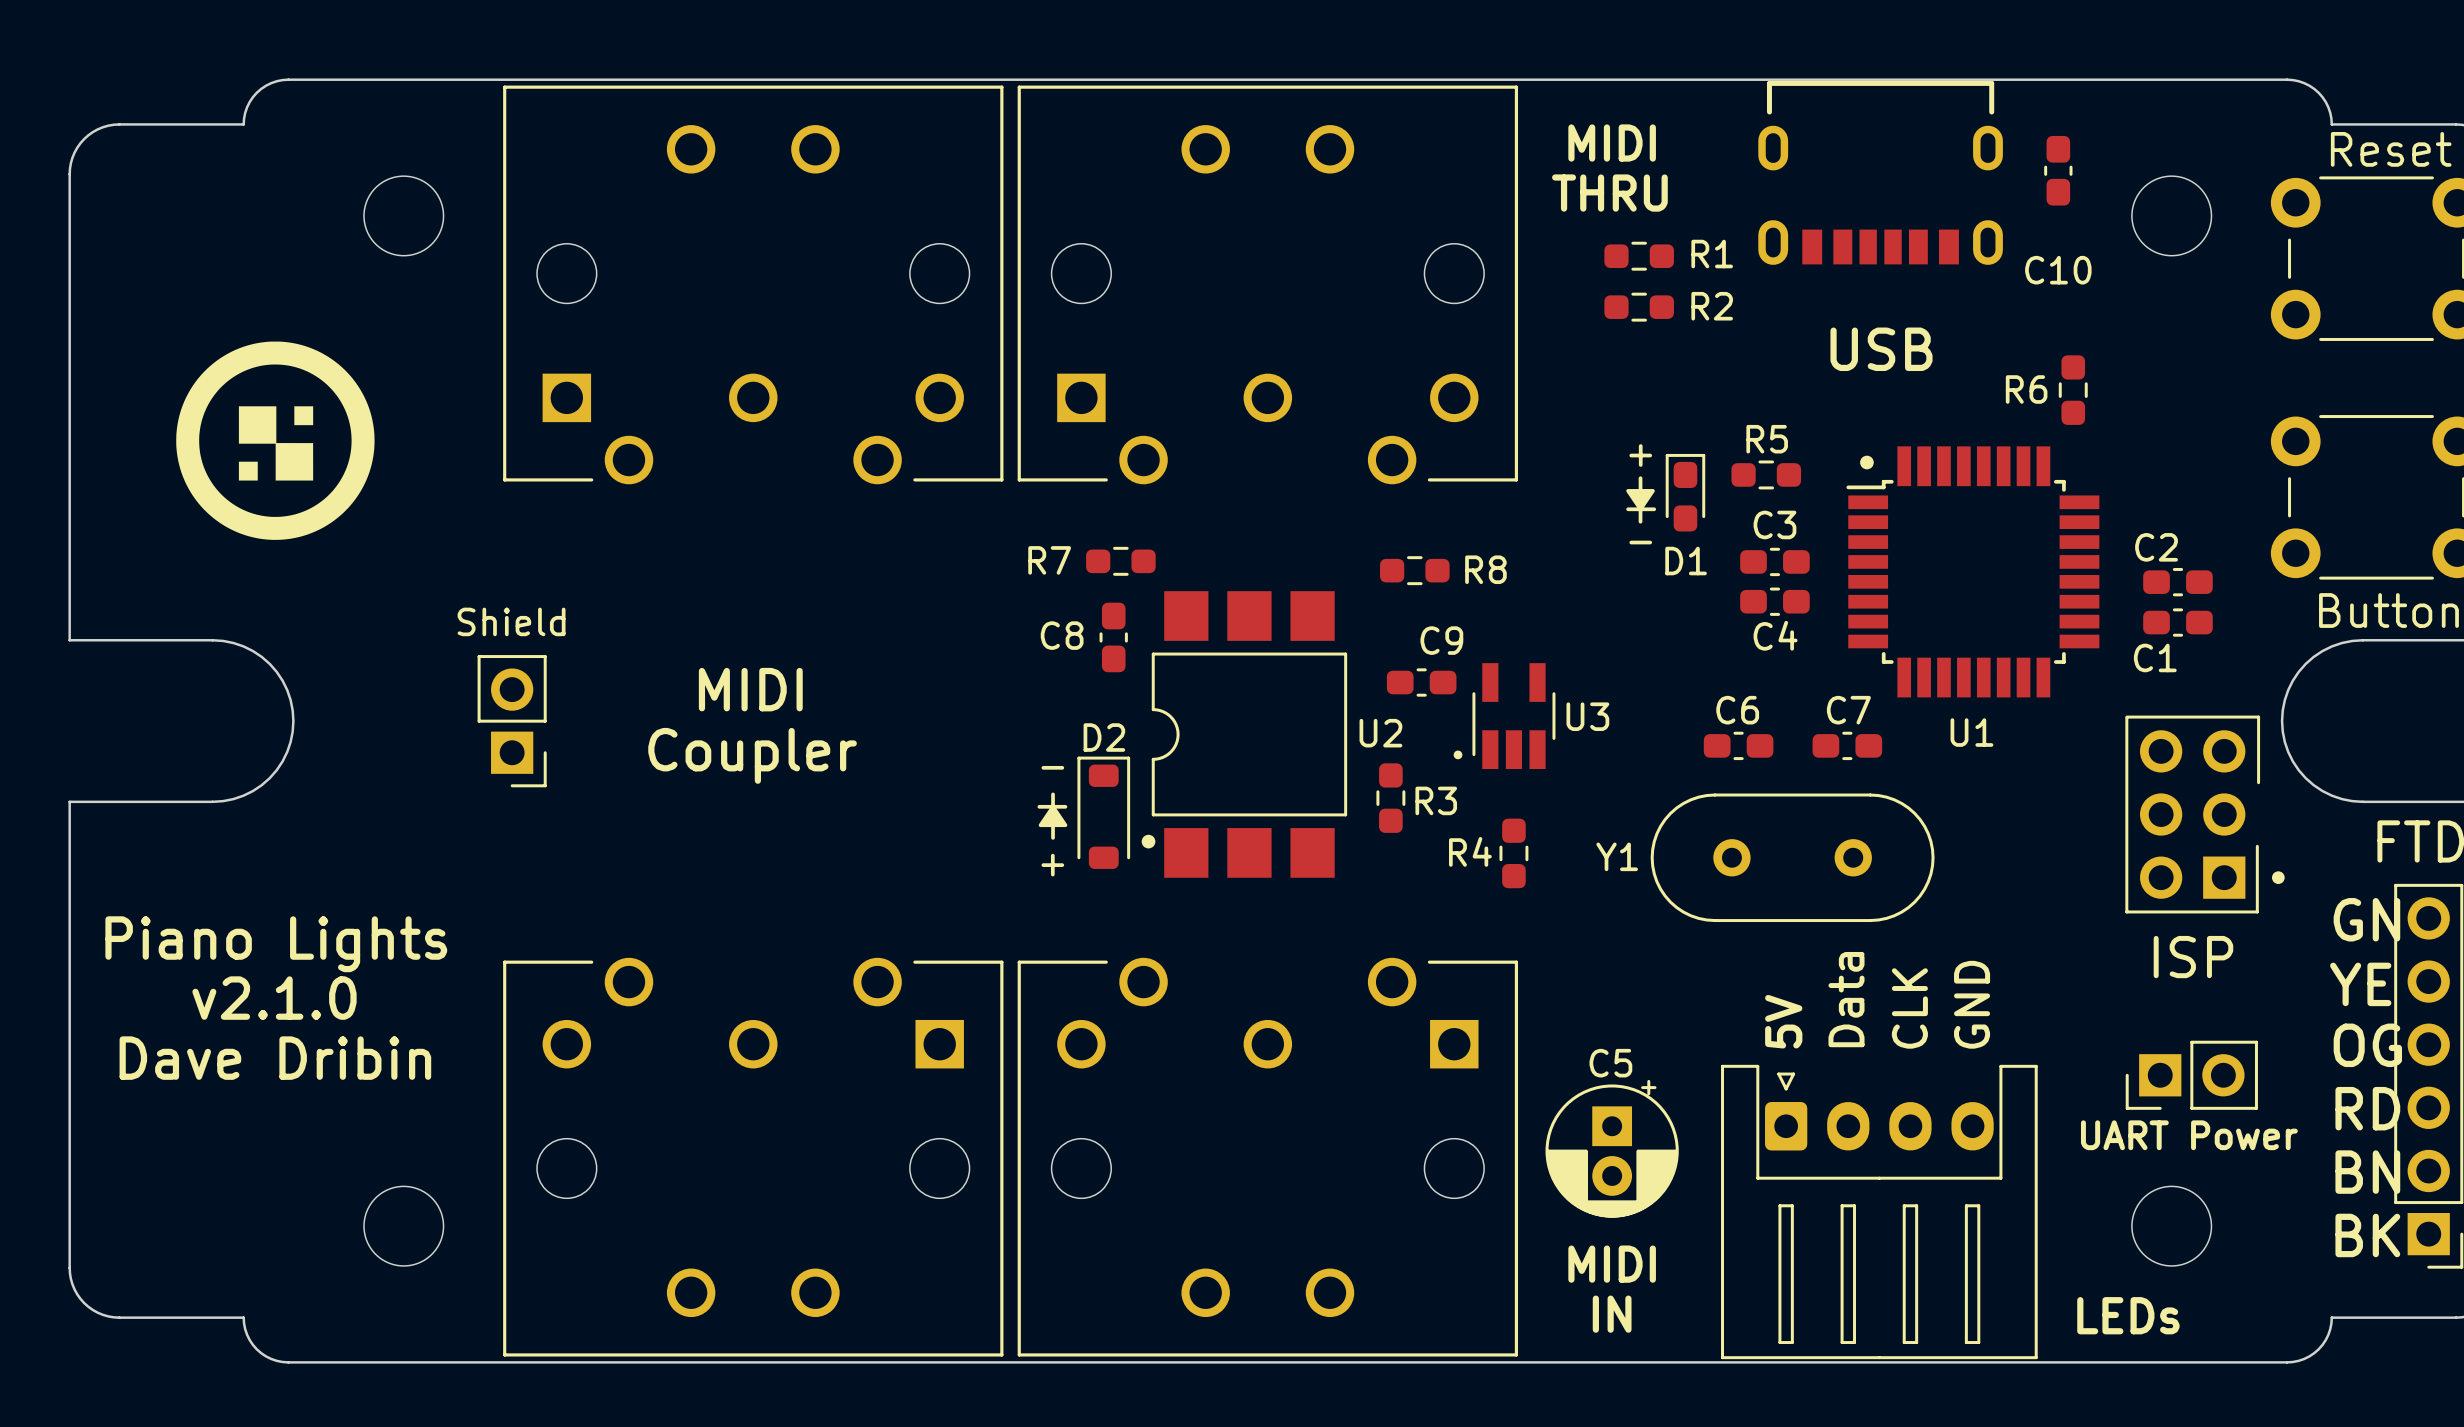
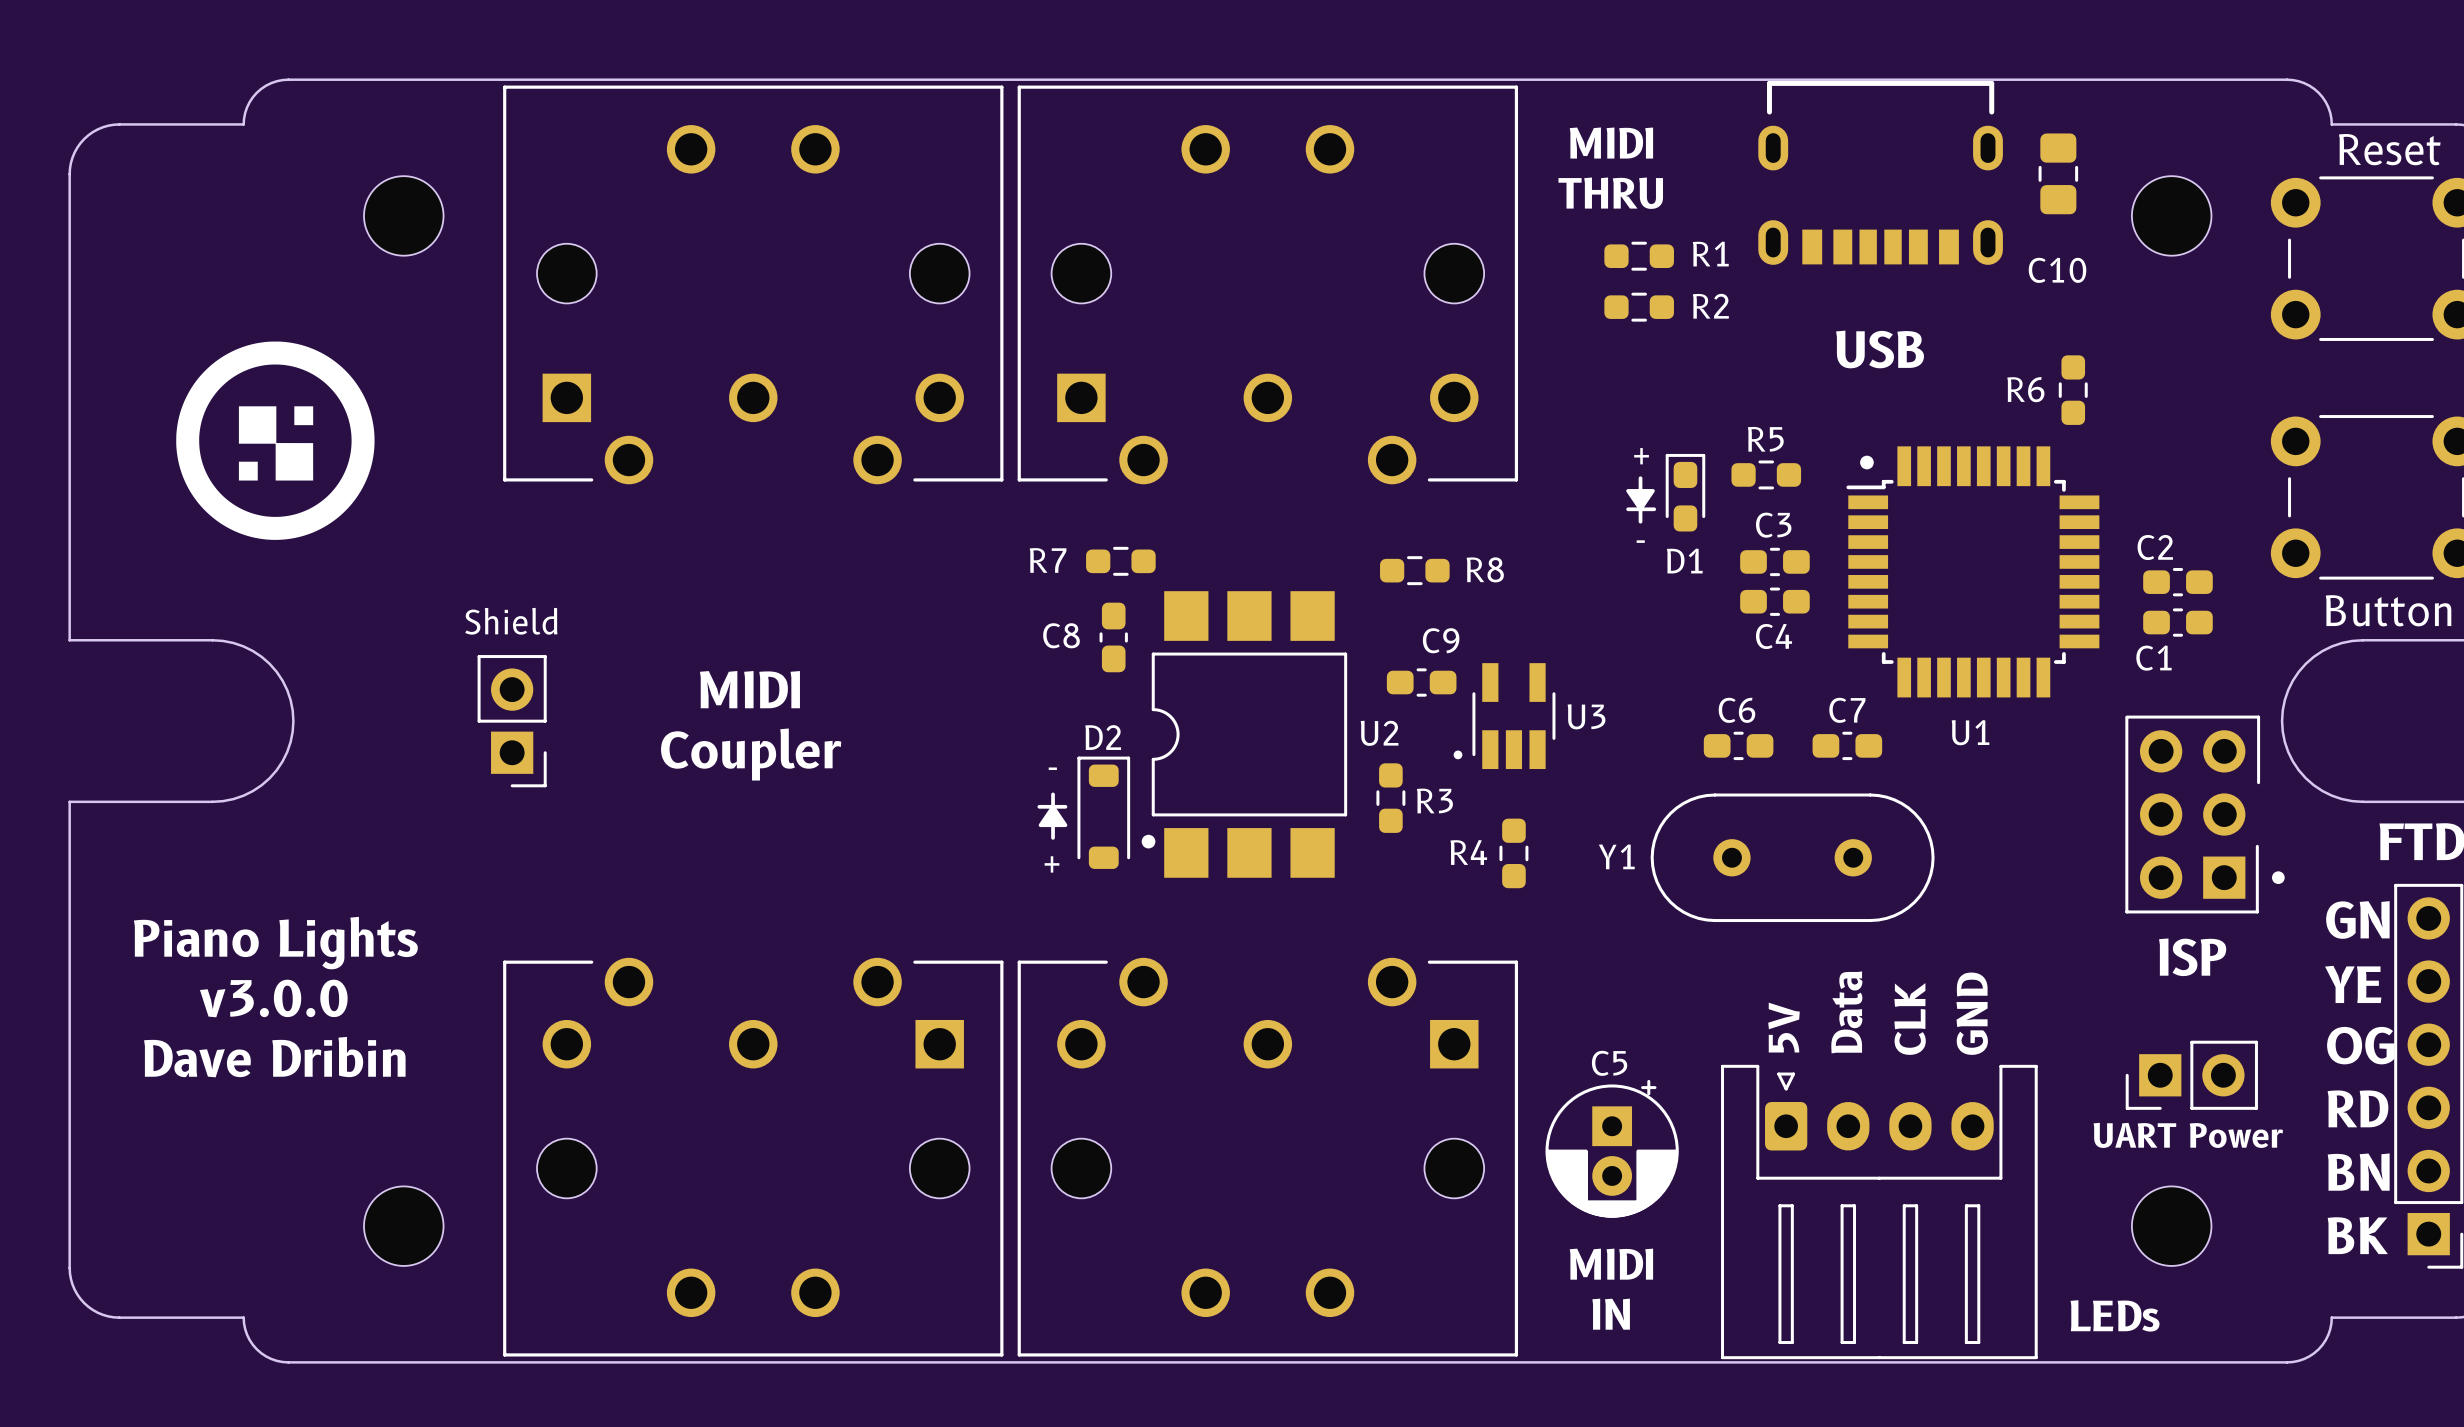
C10 footprint: [2044, 135, 2073, 206] -> [2038, 133, 2079, 215]
text: v2.1.0 (274, 998) -> v3.0.0 (273, 998)

